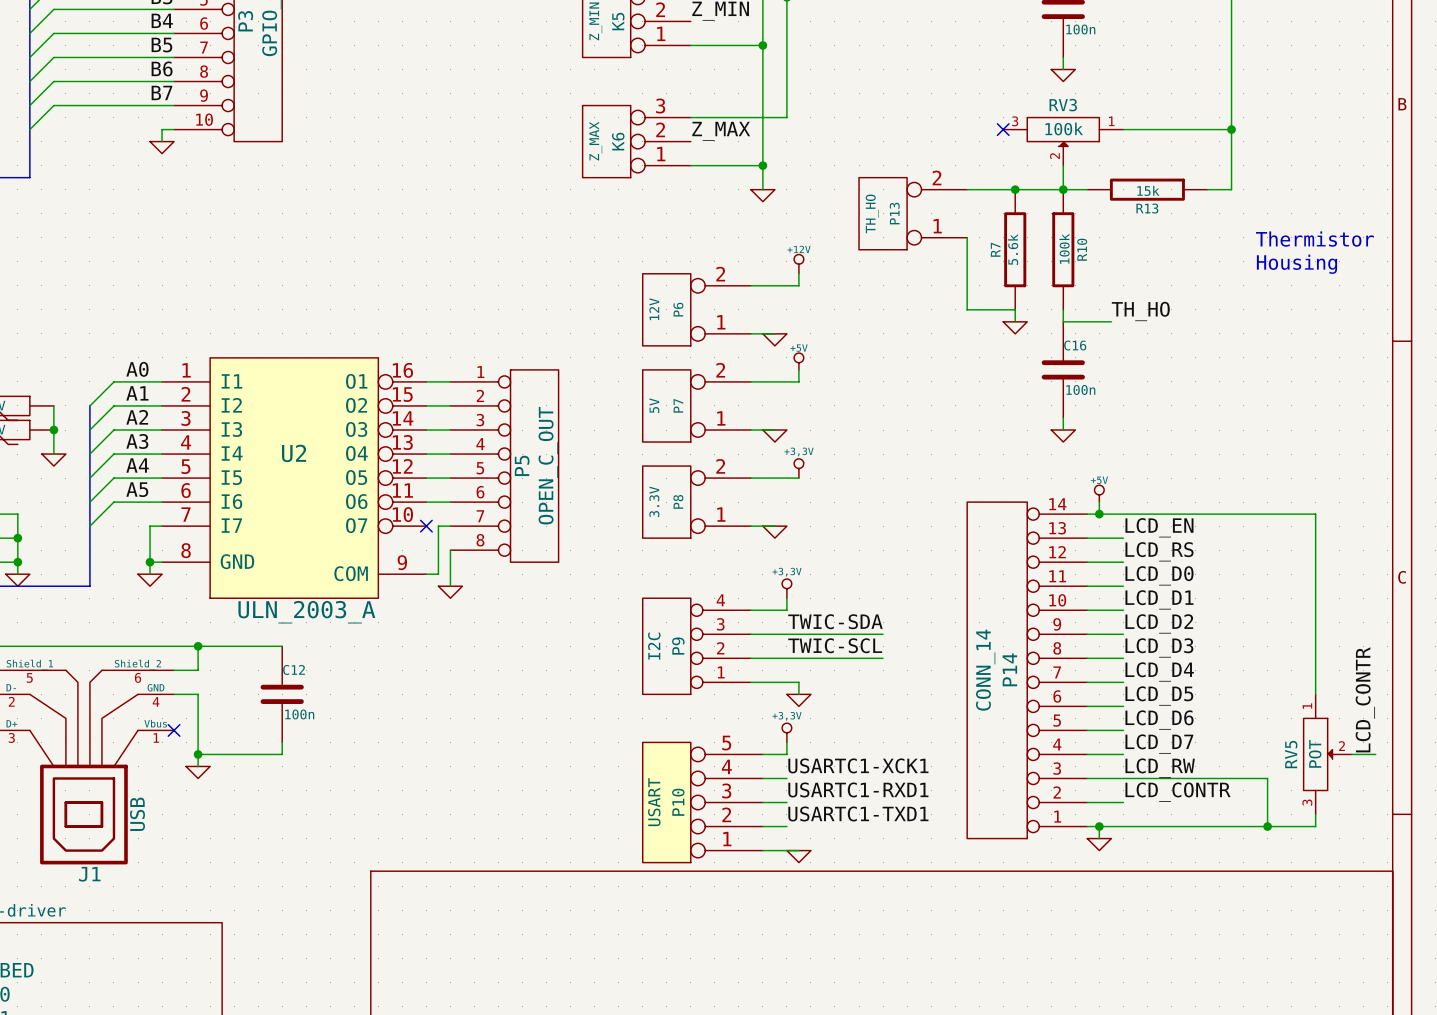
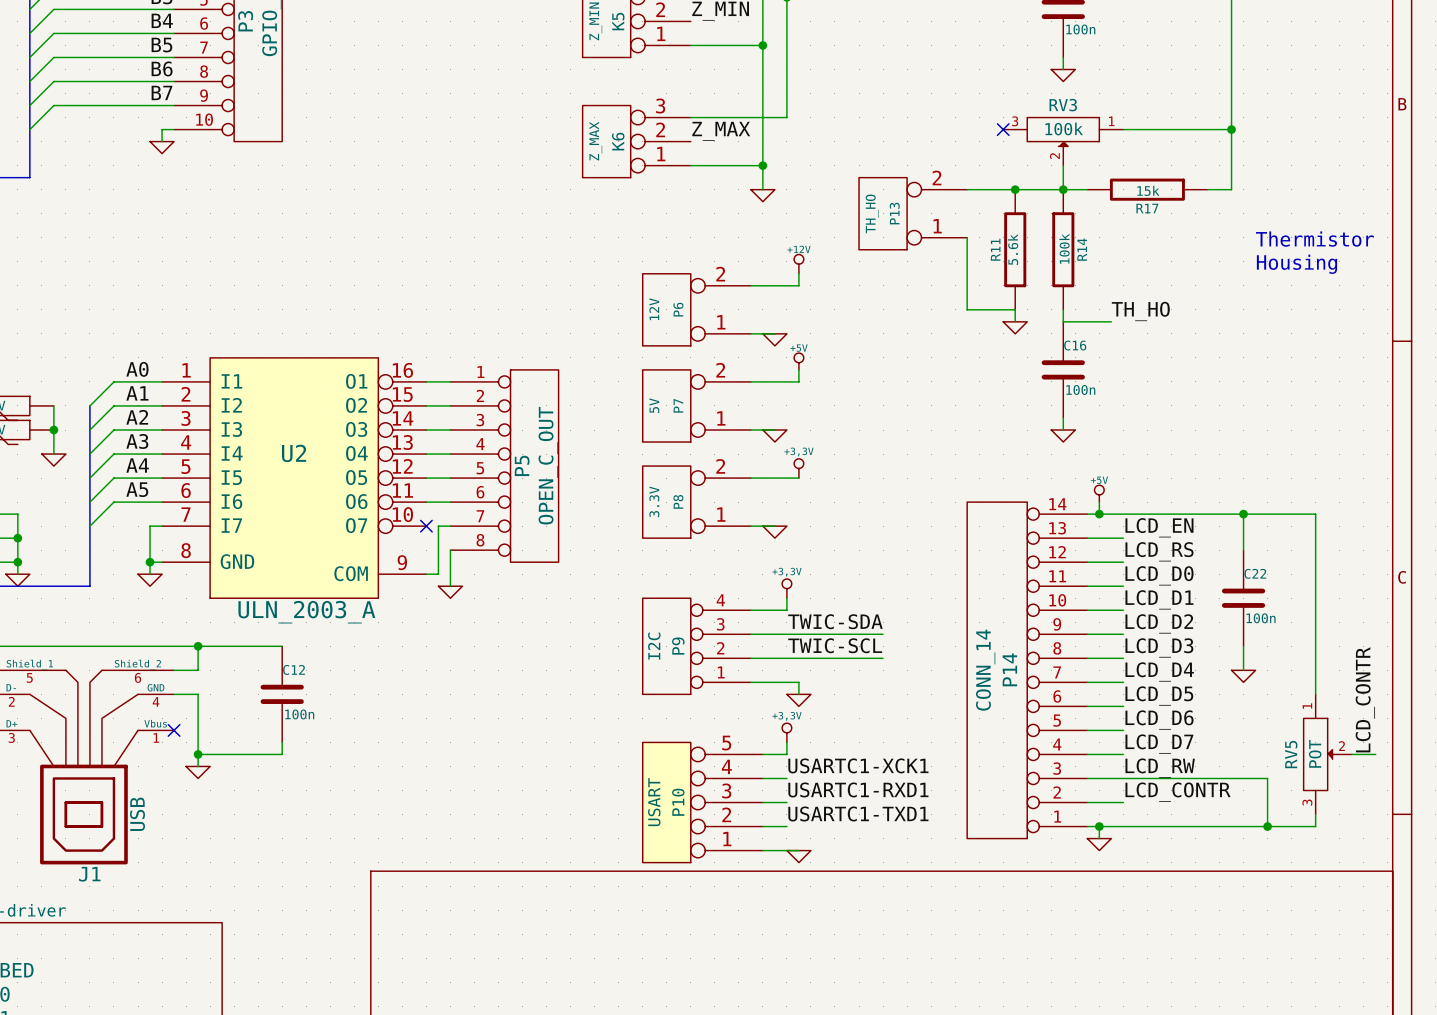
R13 name: R13 (1147, 208) -> R17 (1147, 208)
R7 name: R7 (995, 249) -> R11 (995, 249)
R10 name: R10 (1082, 249) -> R14 (1082, 249)
wire: none -> (1243, 514) (1243, 550)
junction: none -> (1243, 514)
C22: none -> 100n (1243, 598)
wire: none -> (1243, 646) (1243, 670)
power symbol: none -> (1243, 676)

